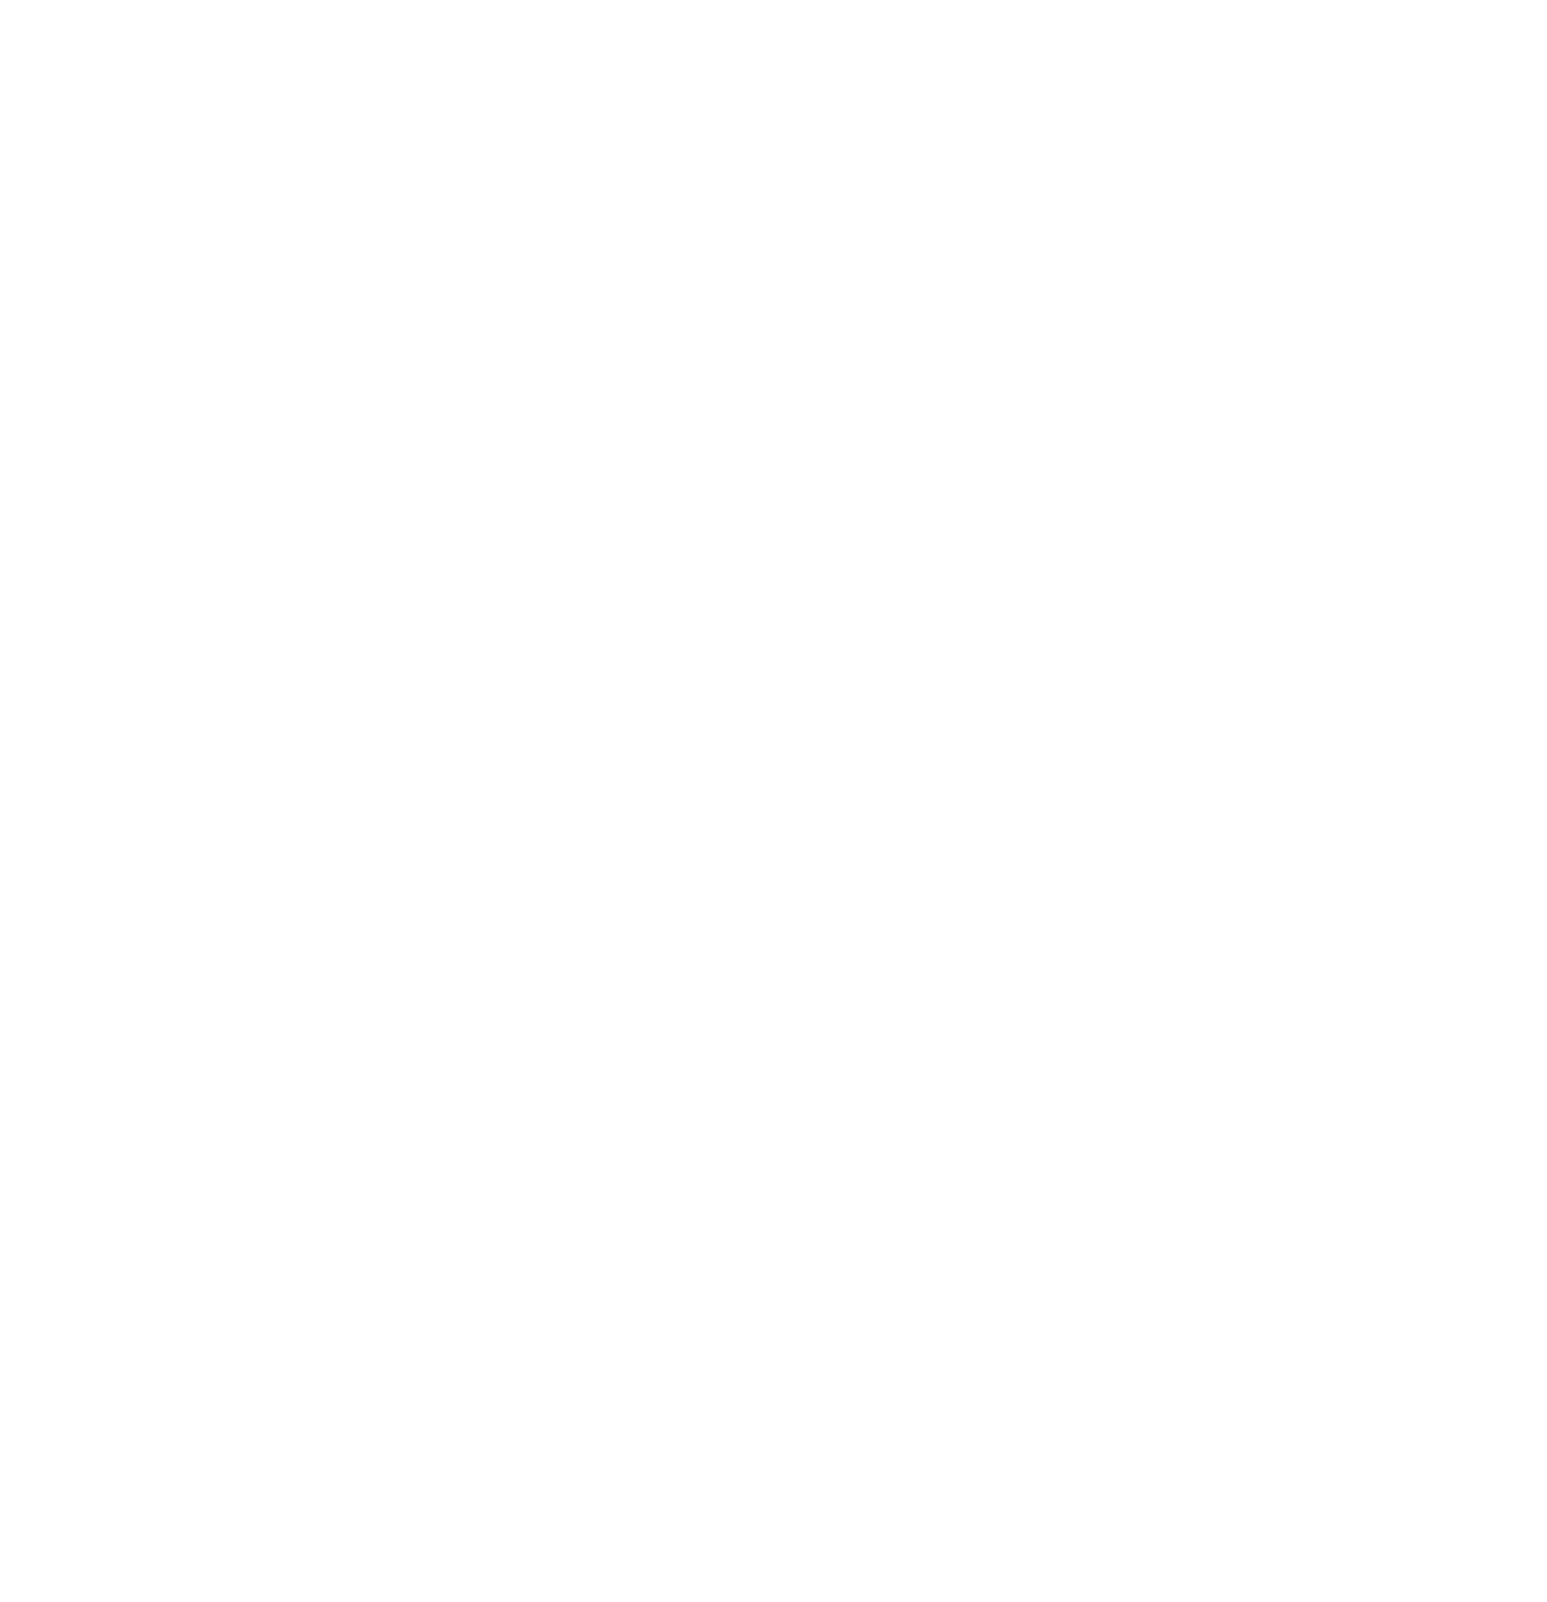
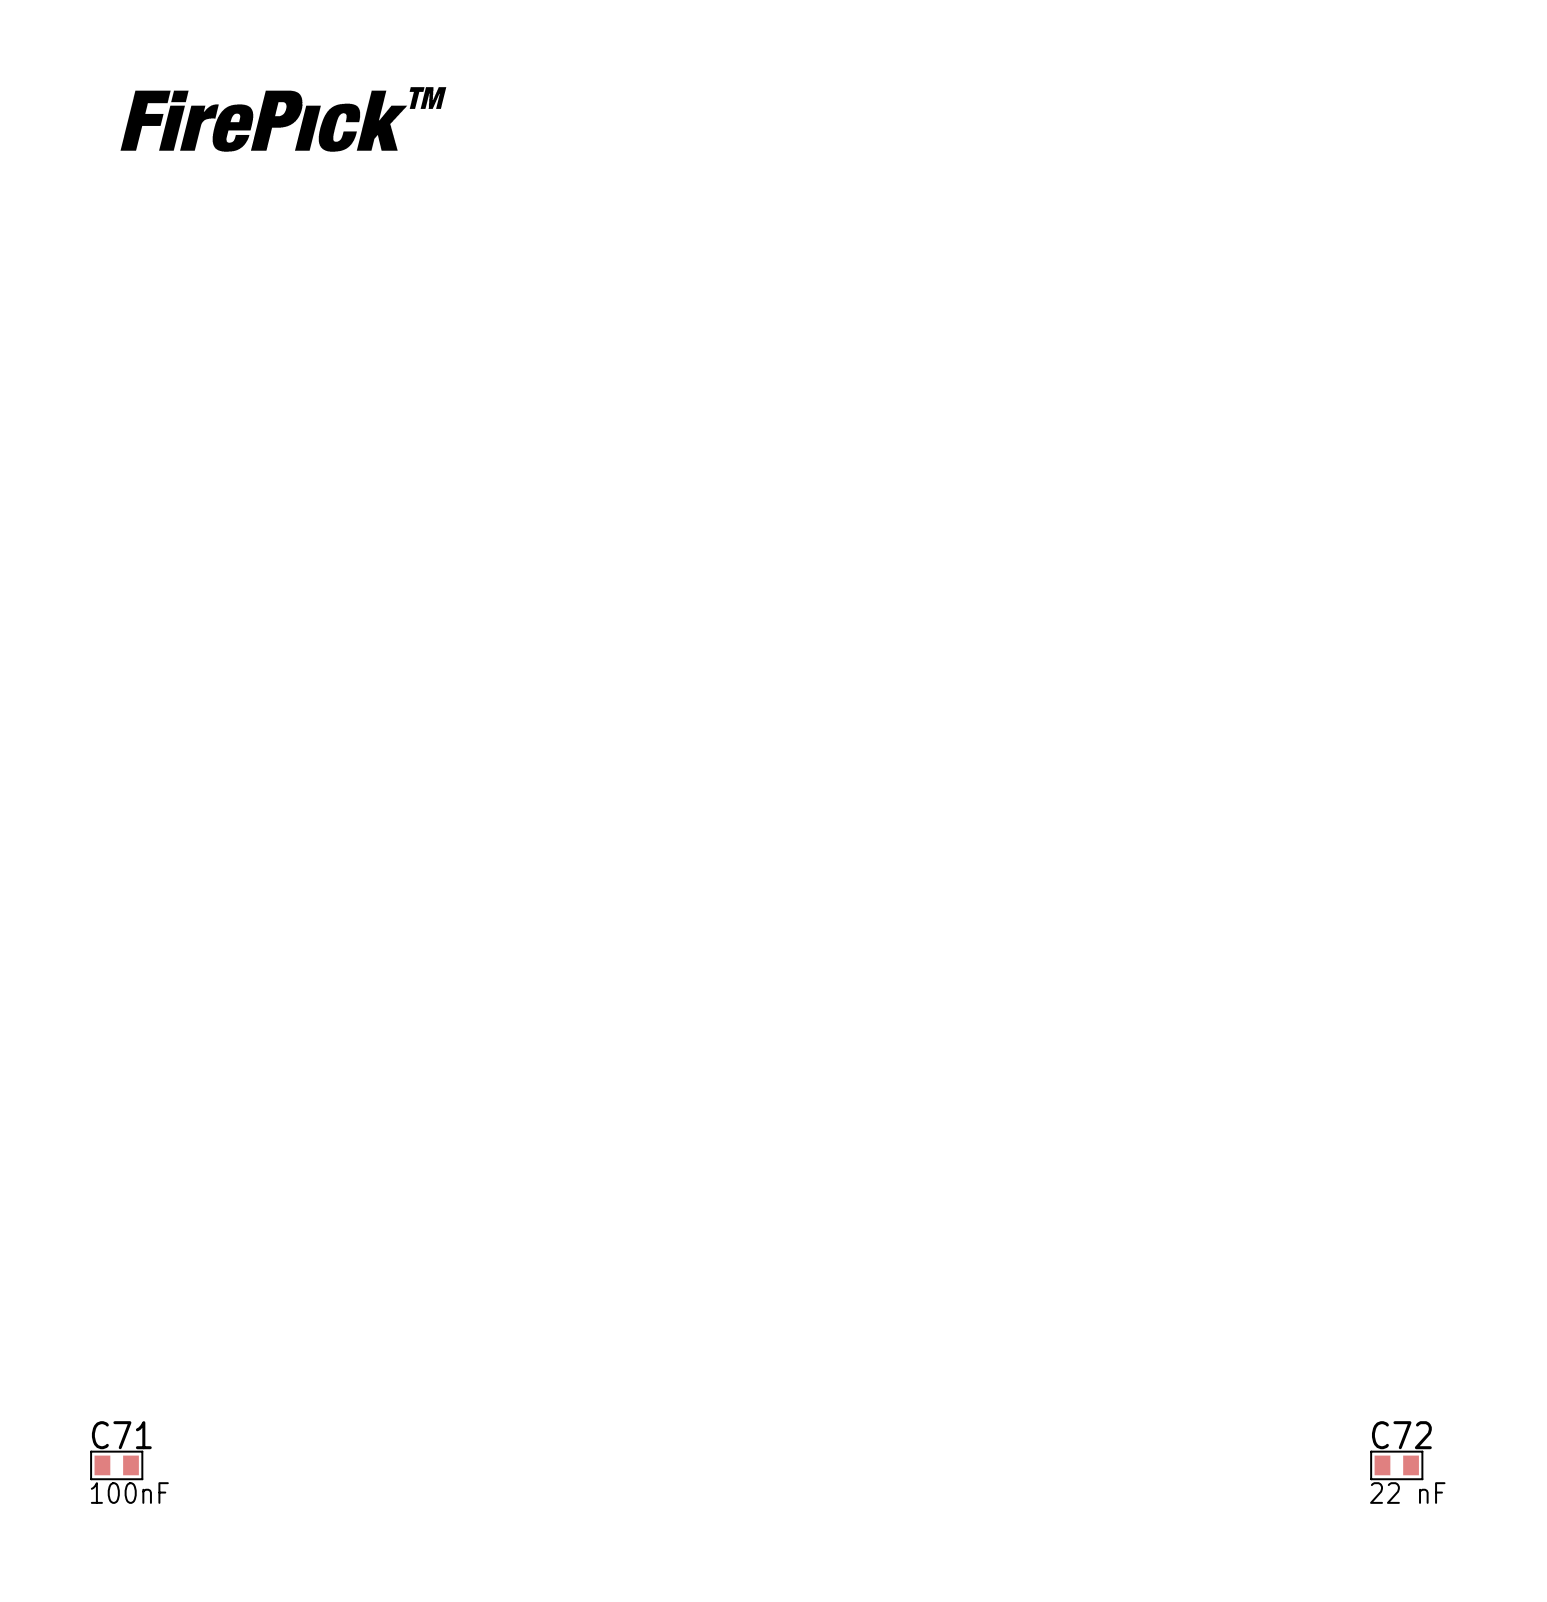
drawing: none -> [120, 87, 447, 152]
C71: none -> 100nF (116, 1465)
C72: none -> 22 nF (1396, 1465)

